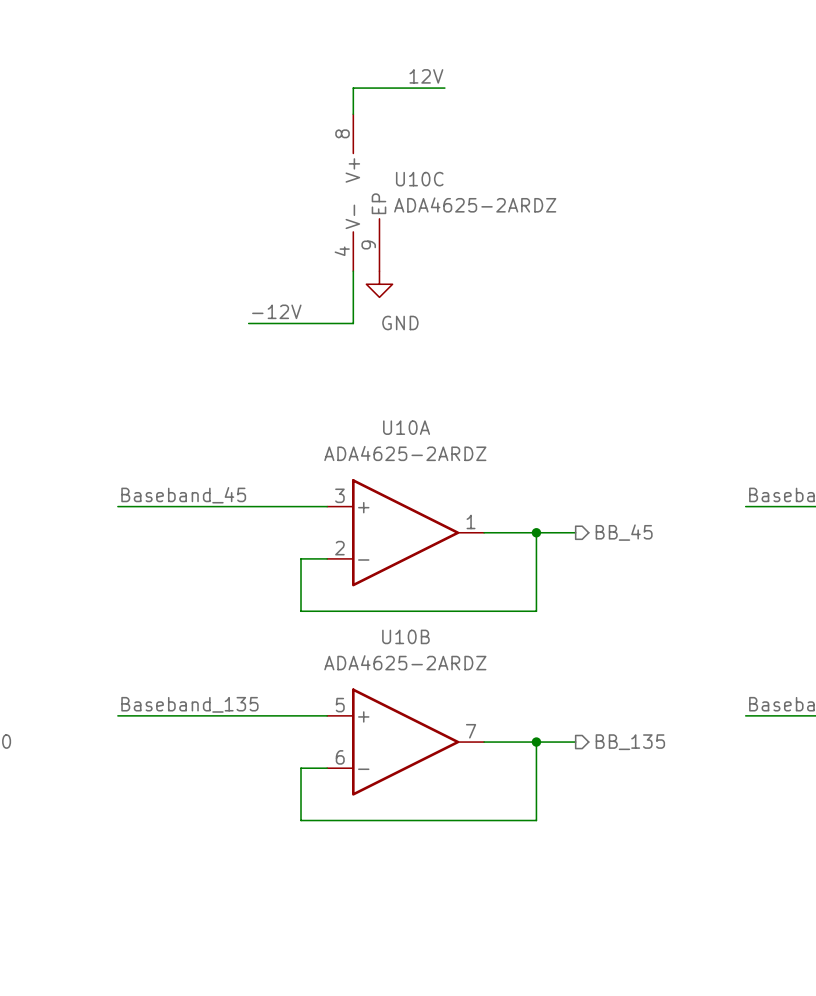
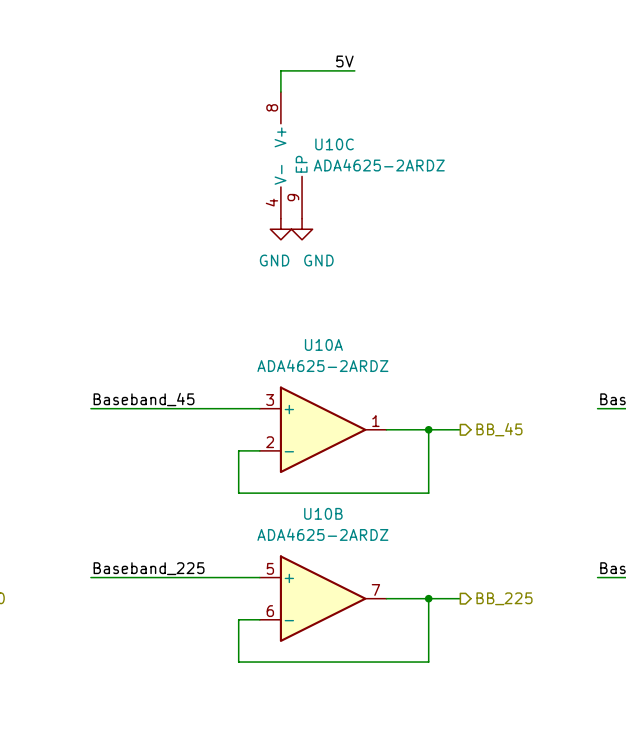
label: 12V (426, 76) -> 5V (344, 61)
wire: (353, 271) (353, 323) (248, 323) -> none
power symbol: none -> GND (280, 229)
label: -12V (276, 311) -> none
label: Baseband_135 (189, 704) -> Baseband_225 (149, 568)
hierarchical label: BB_135 (630, 742) -> BB_225 (504, 598)

